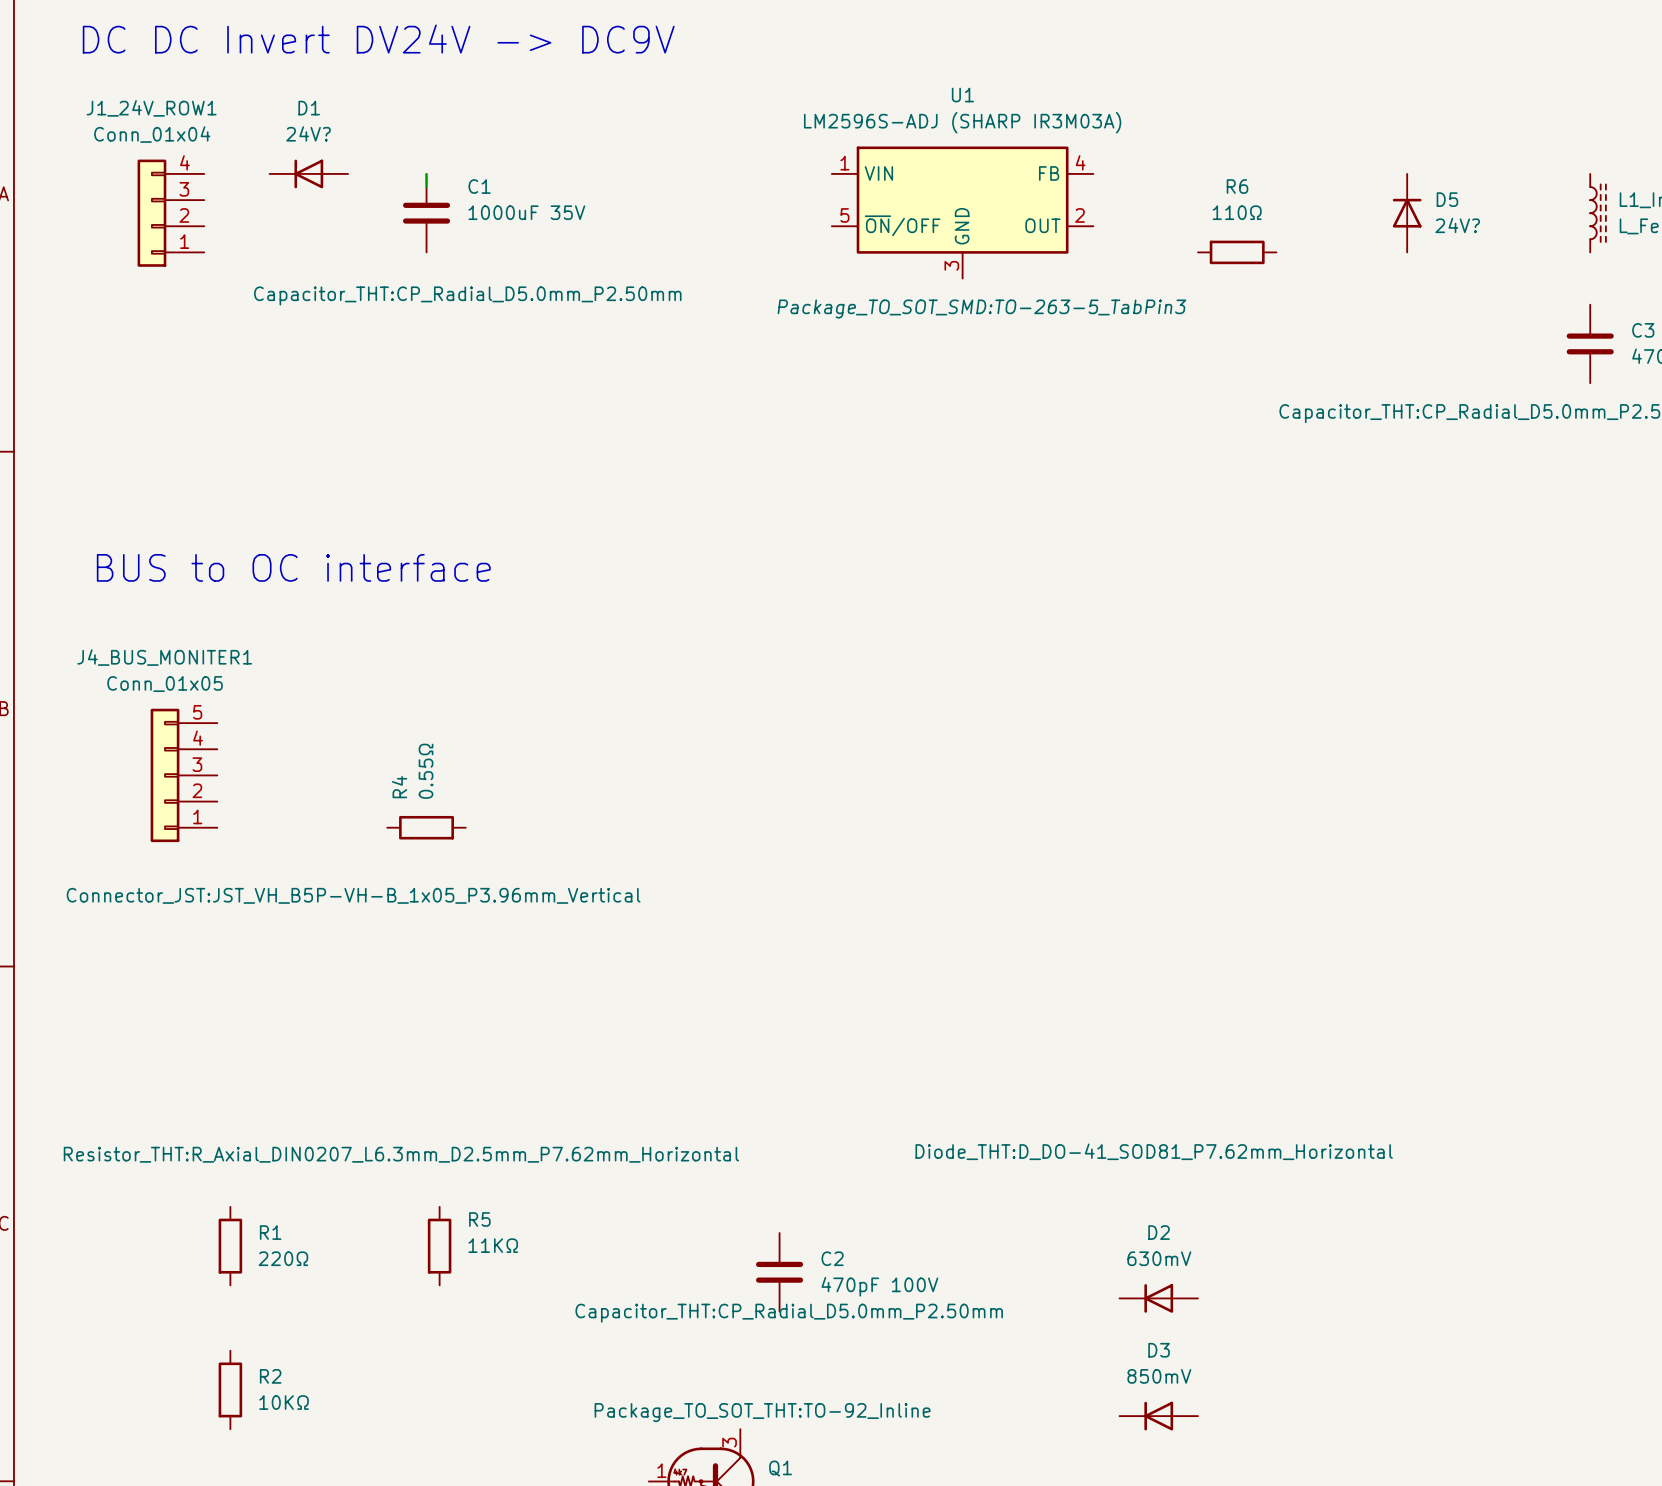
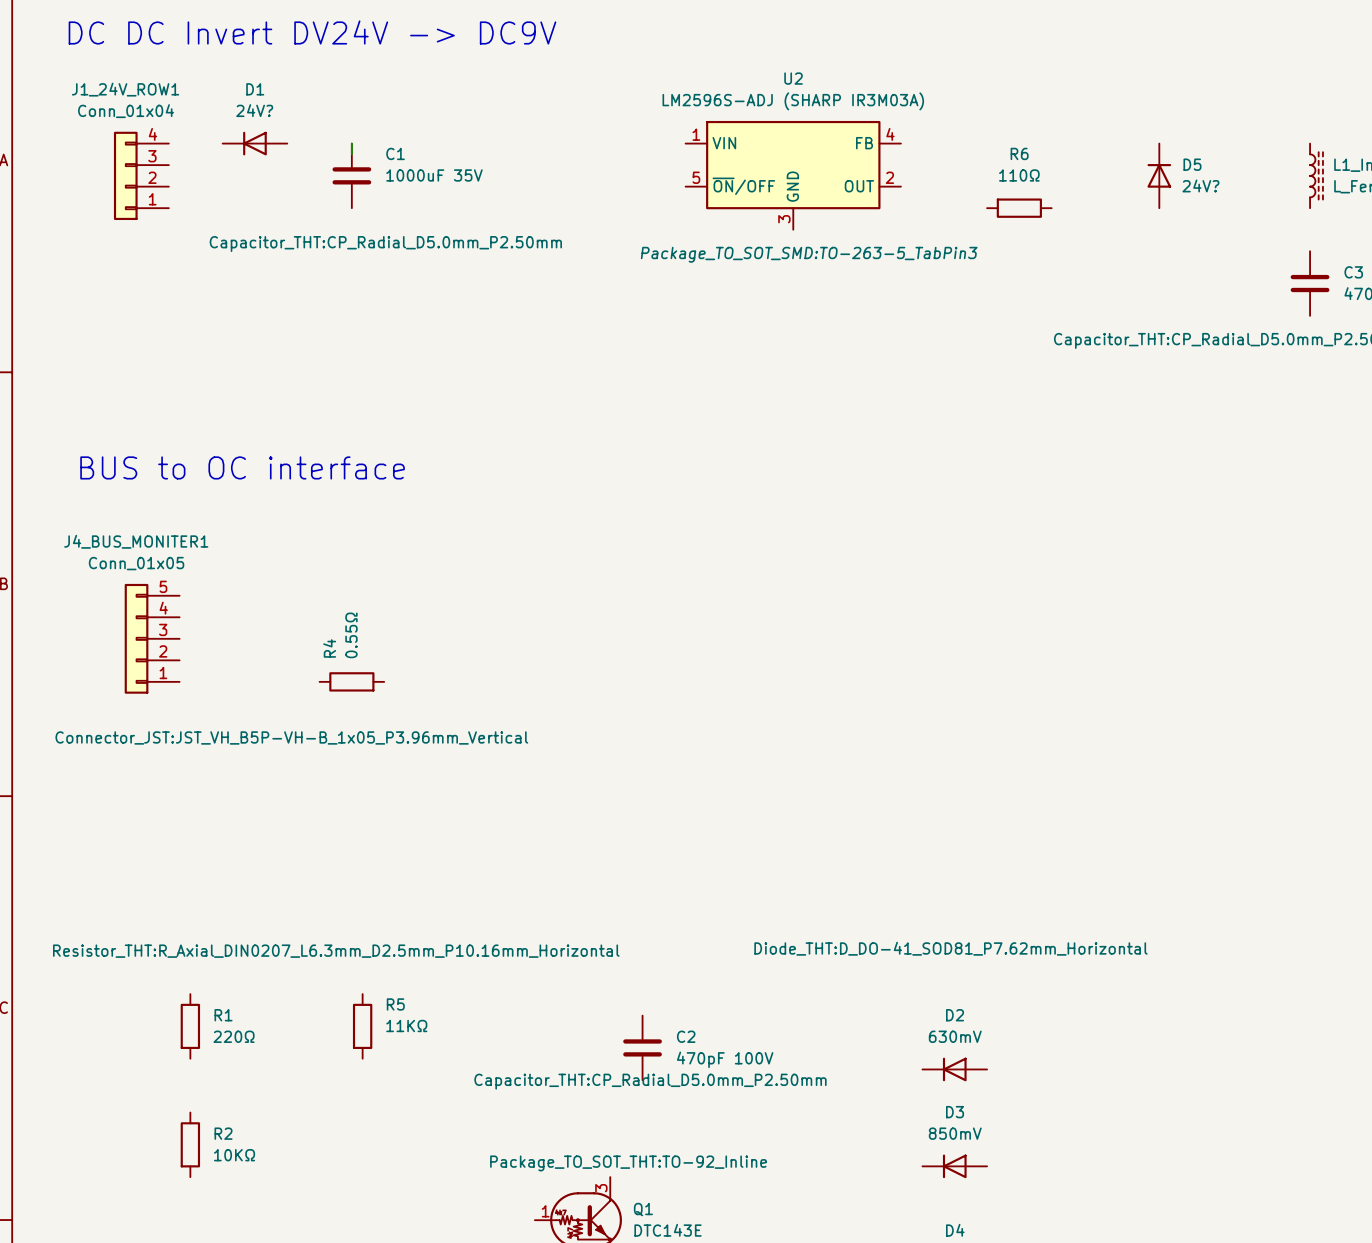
U1 name: U1 (962, 95) -> U2 (793, 78)
R5 text: Resistor_THT:R_Axial_DIN0207_L6.3mm_D2.5mm_P7.62mm_Horizontal (401, 1154) -> Resistor_THT:R_Axial_DIN0207_L6.3mm_D2.5mm_P10.16mm_Horizontal (336, 951)

